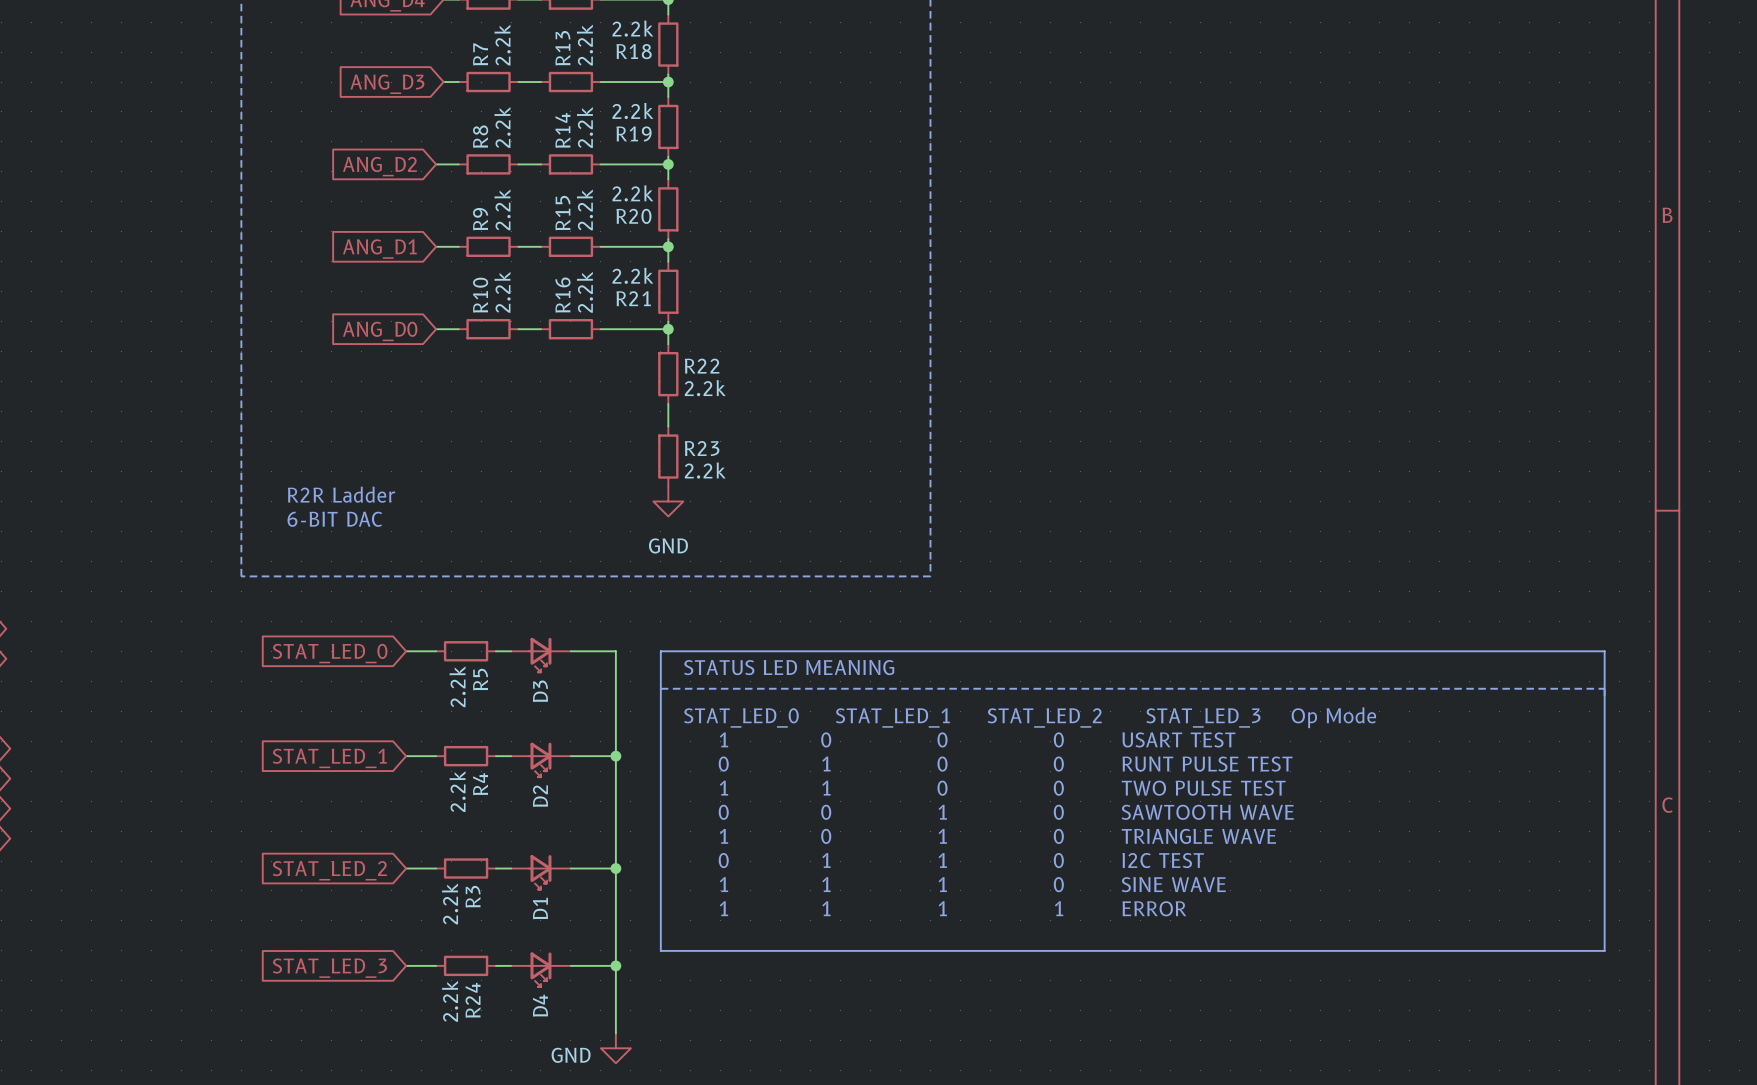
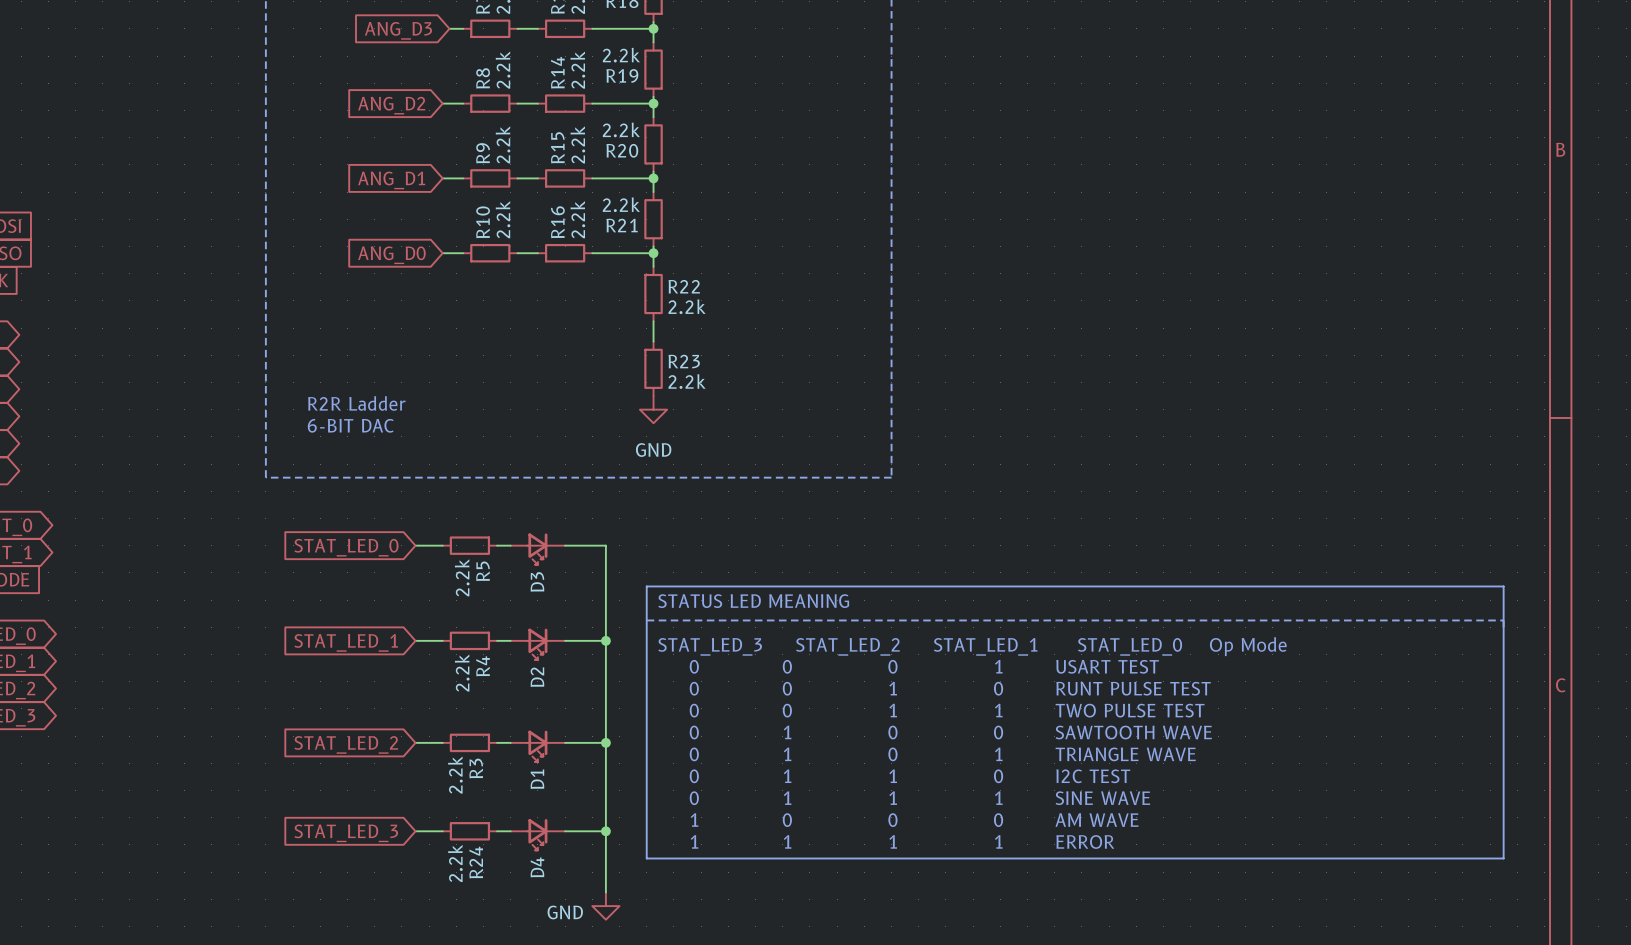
text position: STATUS LED MEANING (789, 667) -> STATUS LED MEANING (753, 601)
line: (660, 688) (1604, 688) (1604, 696) (1604, 651) (660, 651) (660, 696) -> (1503, 586) (646, 586)
text: STAT_LED_0 STAT_LED_1 STAT_LED_2 STAT_LED_3 Op Mode (1030, 717) -> none
line: none -> (646, 620) (1503, 620) (1503, 627)
text: 1 0 0 0 USART TEST (977, 739) -> none
text: 0 1 0 0 RUNT PULSE TEST (1005, 764) -> STAT_LED_3 STAT_LED_2 STAT_LED_1 STAT_LED_0 Op Mode (972, 646)
text: 1 1 0 0 TWO PULSE TEST (1002, 788) -> 0 0 0 1 USART TEST (924, 666)
text: 0 0 1 0 SAWTOOTH WAVE (1006, 812) -> 0 0 1 0 RUNT PULSE TEST (950, 688)
text: 1 0 1 0 TRIANGLE WAVE (997, 836) -> 0 0 1 1 TWO PULSE TEST (947, 710)
text: none -> 0 1 0 0 SAWTOOTH WAVE (950, 732)
text position: 0 1 1 0 I2C TEST (961, 860) -> 0 1 1 0 I2C TEST (909, 776)
text: 1 1 1 0 SINE WAVE (972, 884) -> 0 1 0 1 TRIANGLE WAVE (942, 754)
text position: 1 1 1 1 ERROR (953, 908) -> 1 1 1 1 ERROR (902, 841)
text: none -> 0 1 1 1 SINE WAVE (919, 798)
line: (660, 950) (1604, 950) -> (646, 817) (646, 858) (1503, 858) (1503, 817)
text: none -> 1 0 0 0 AM WAVE (914, 820)

